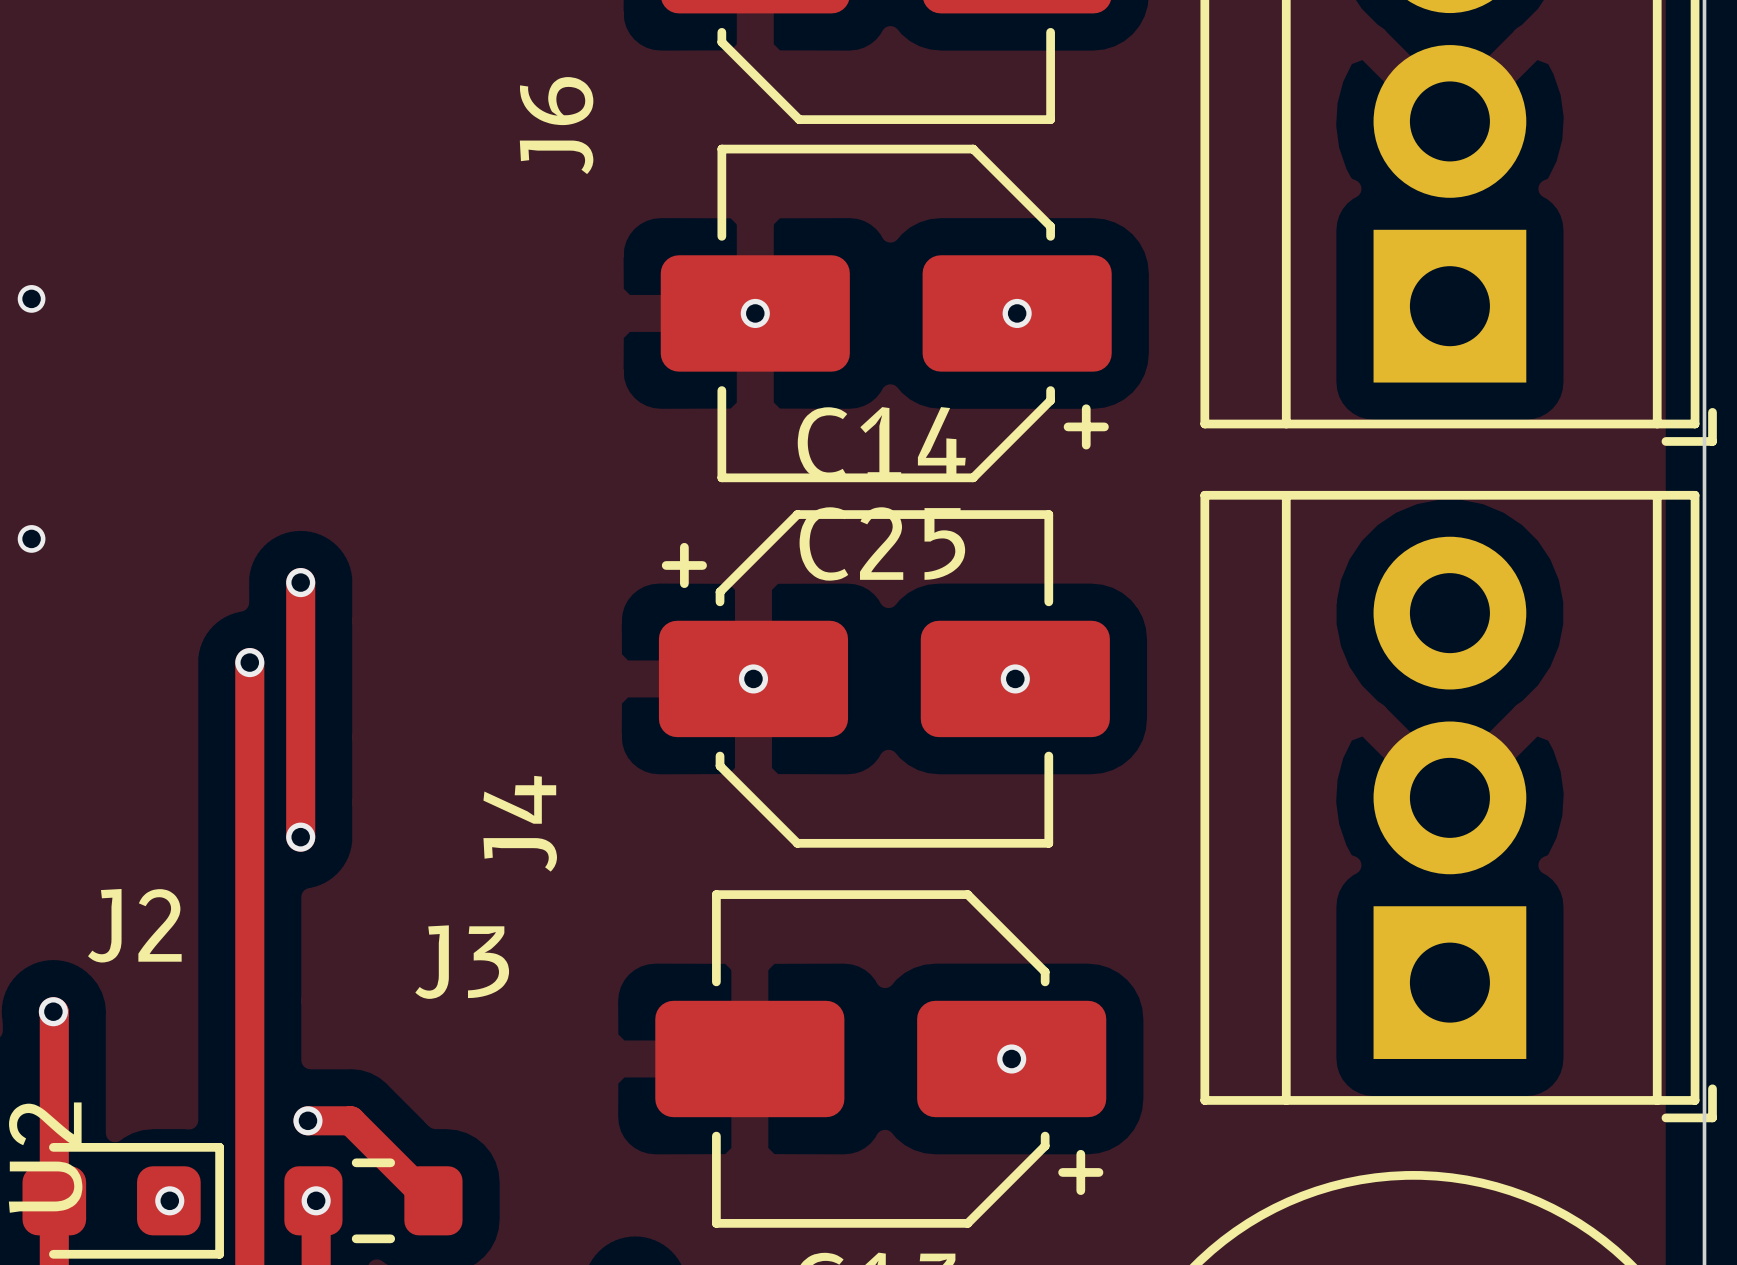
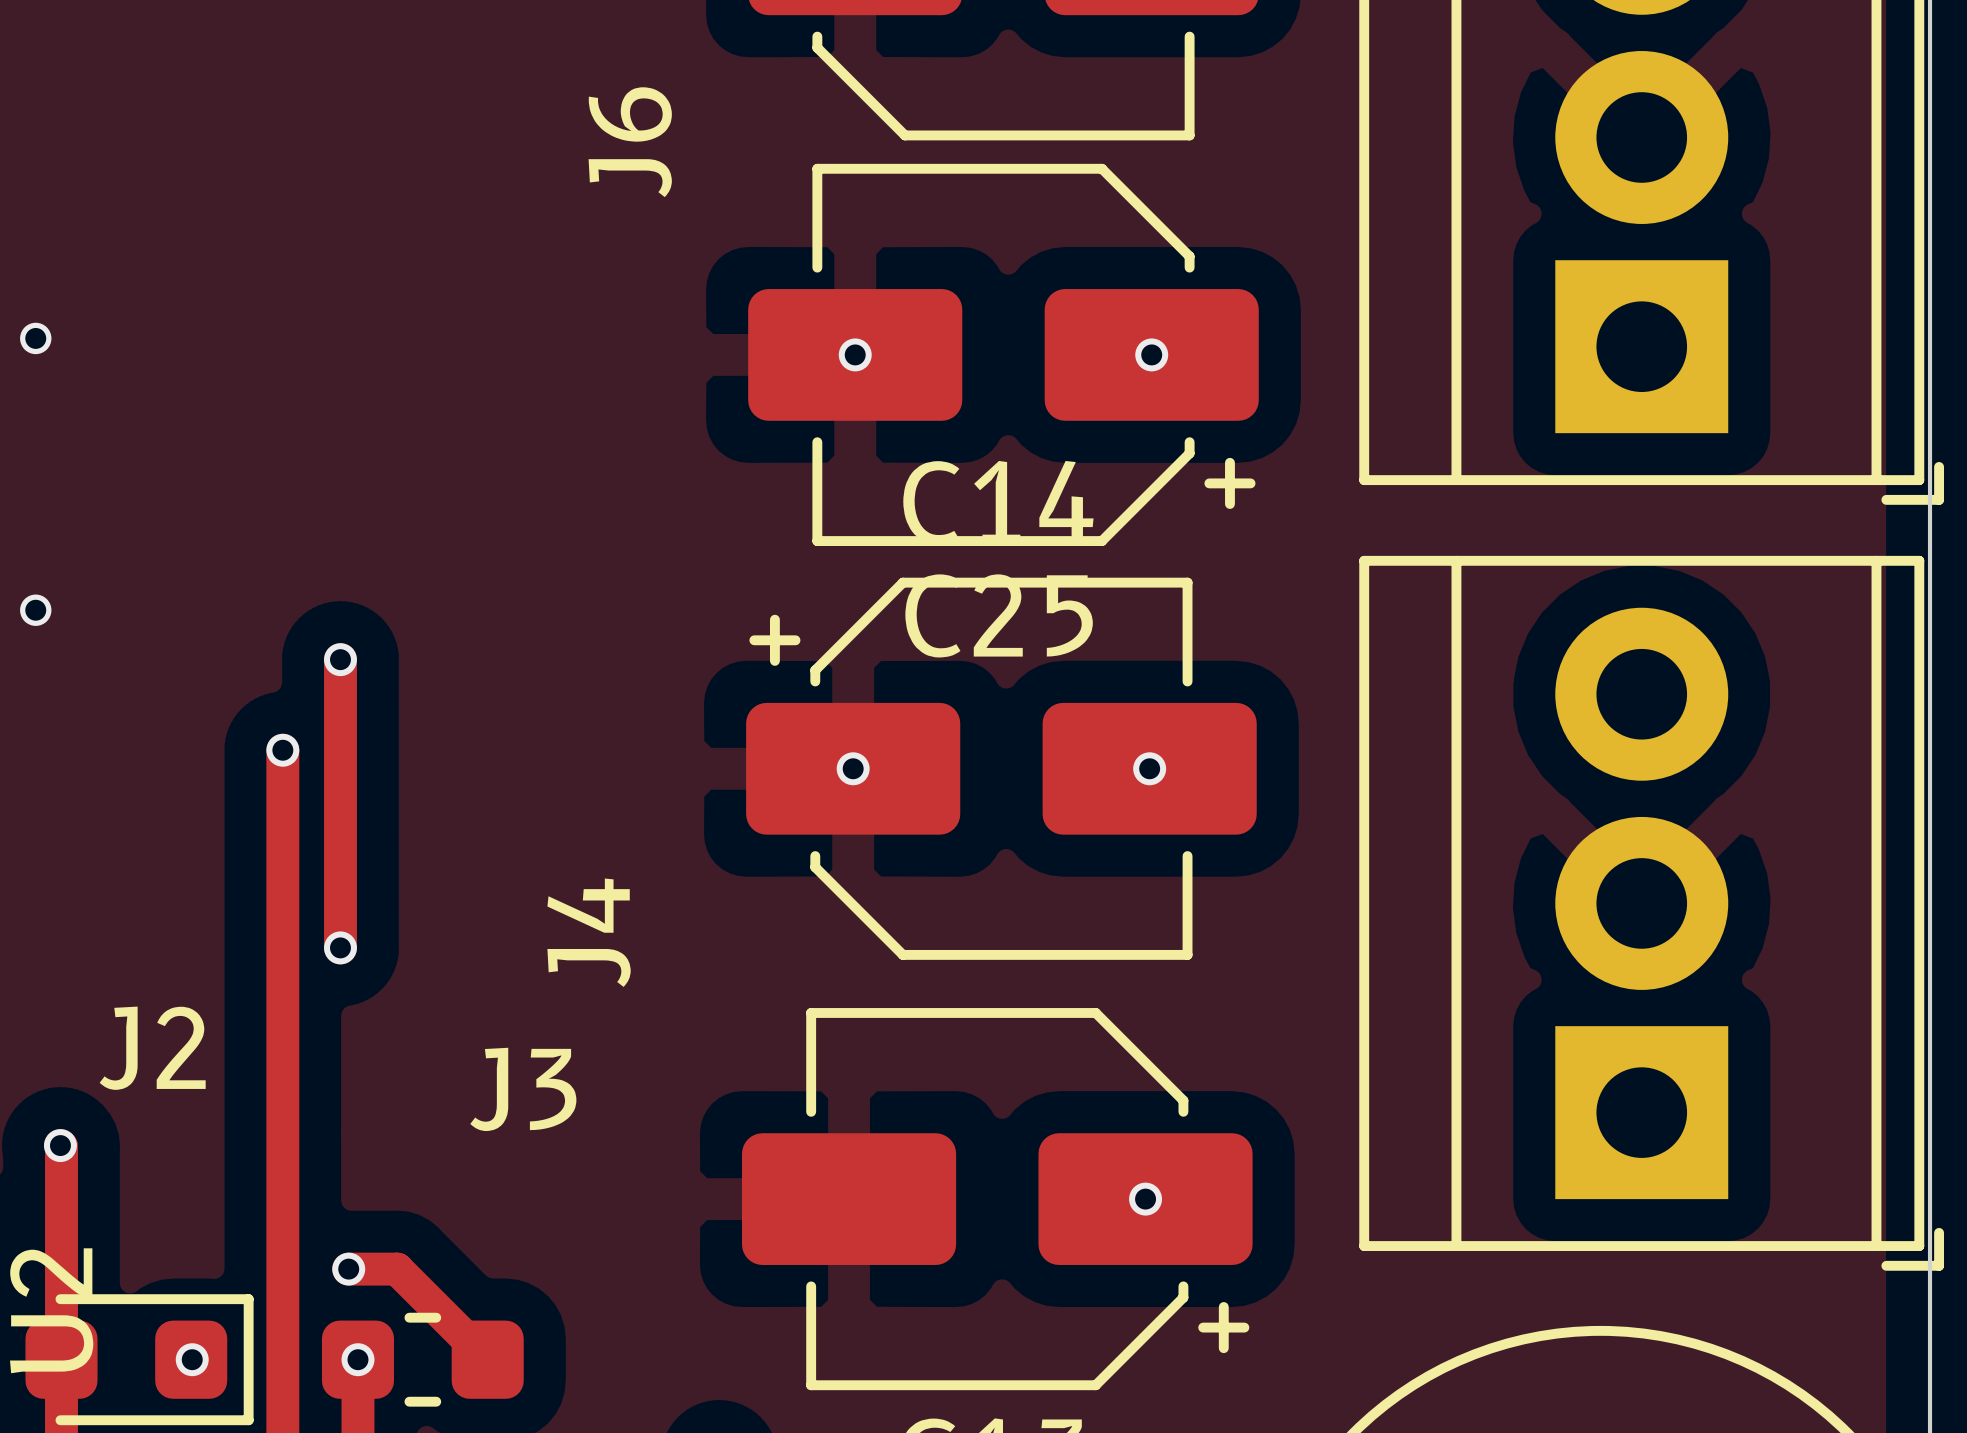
part footprint: [284, 1158, 463, 1244] -> [321, 1312, 524, 1407]

